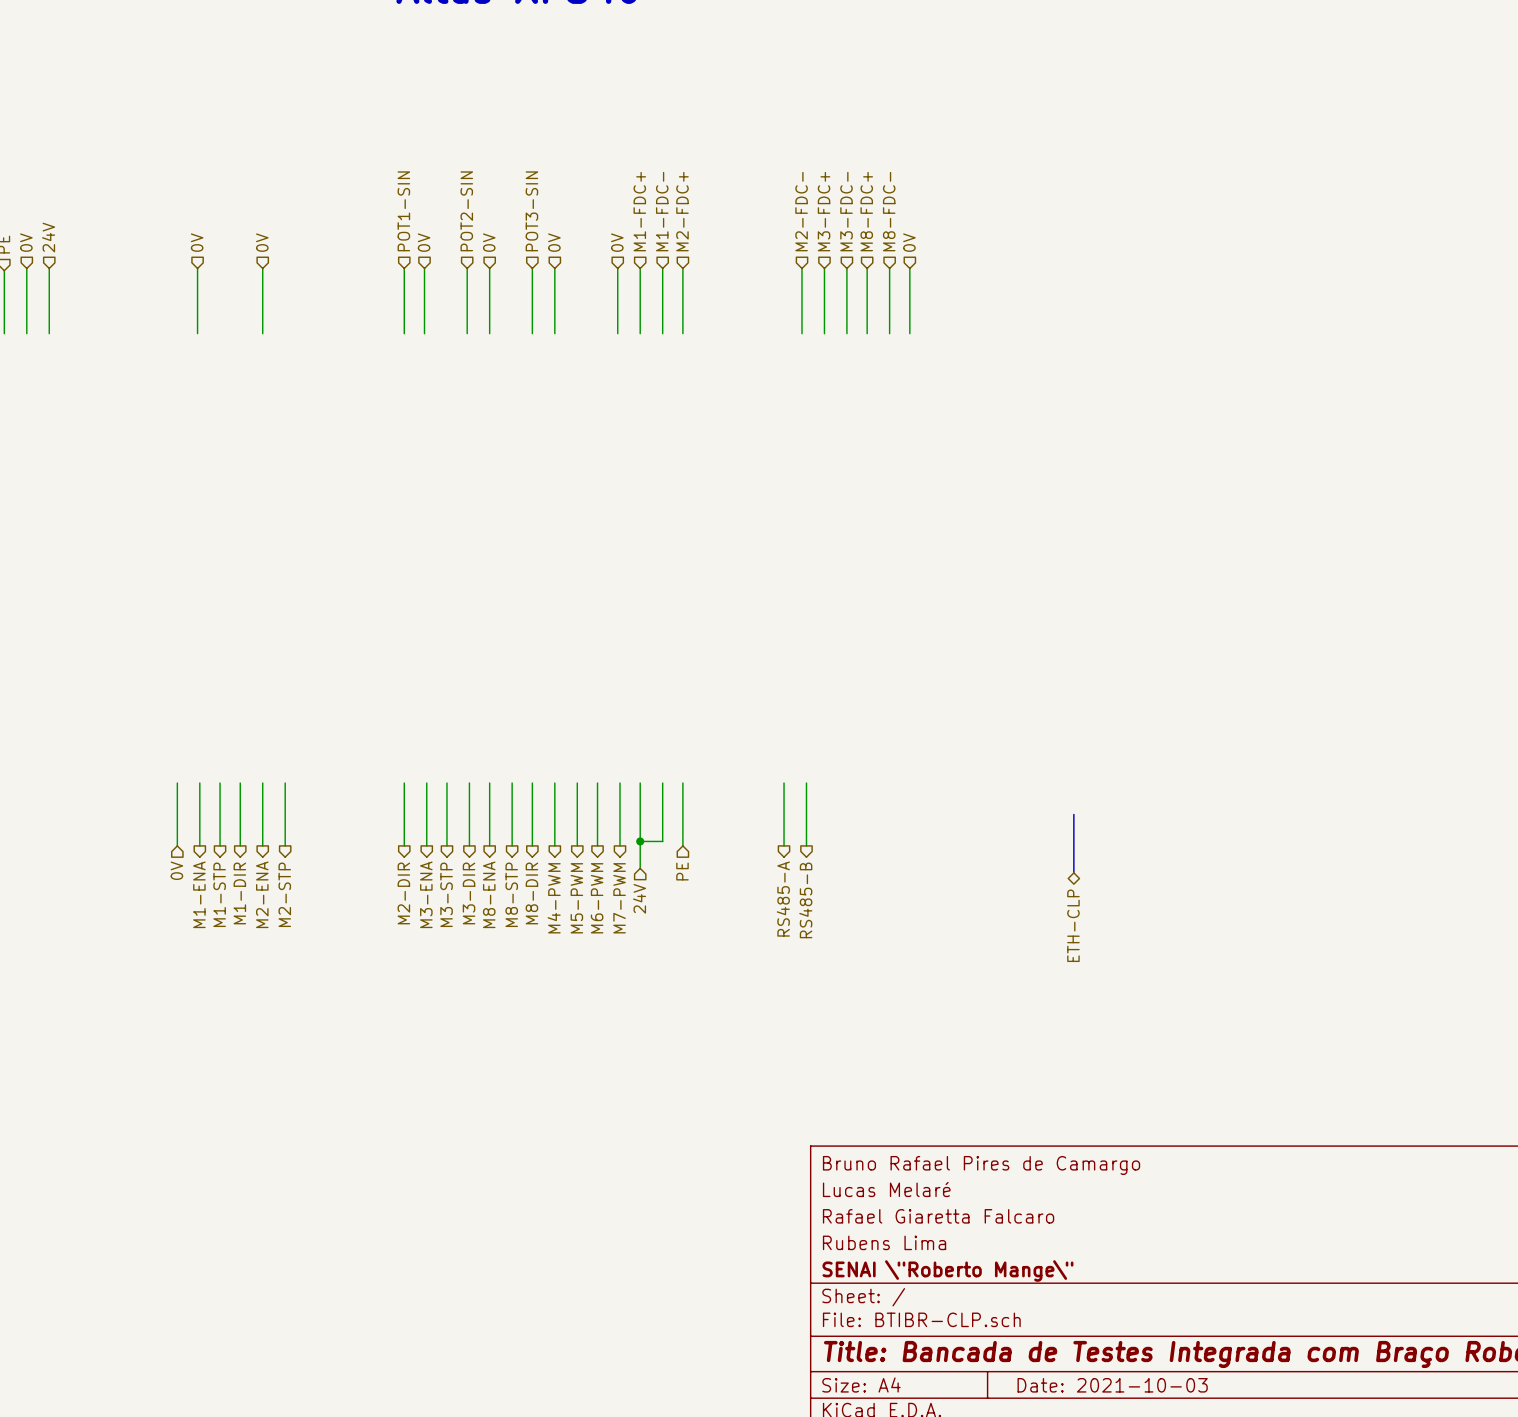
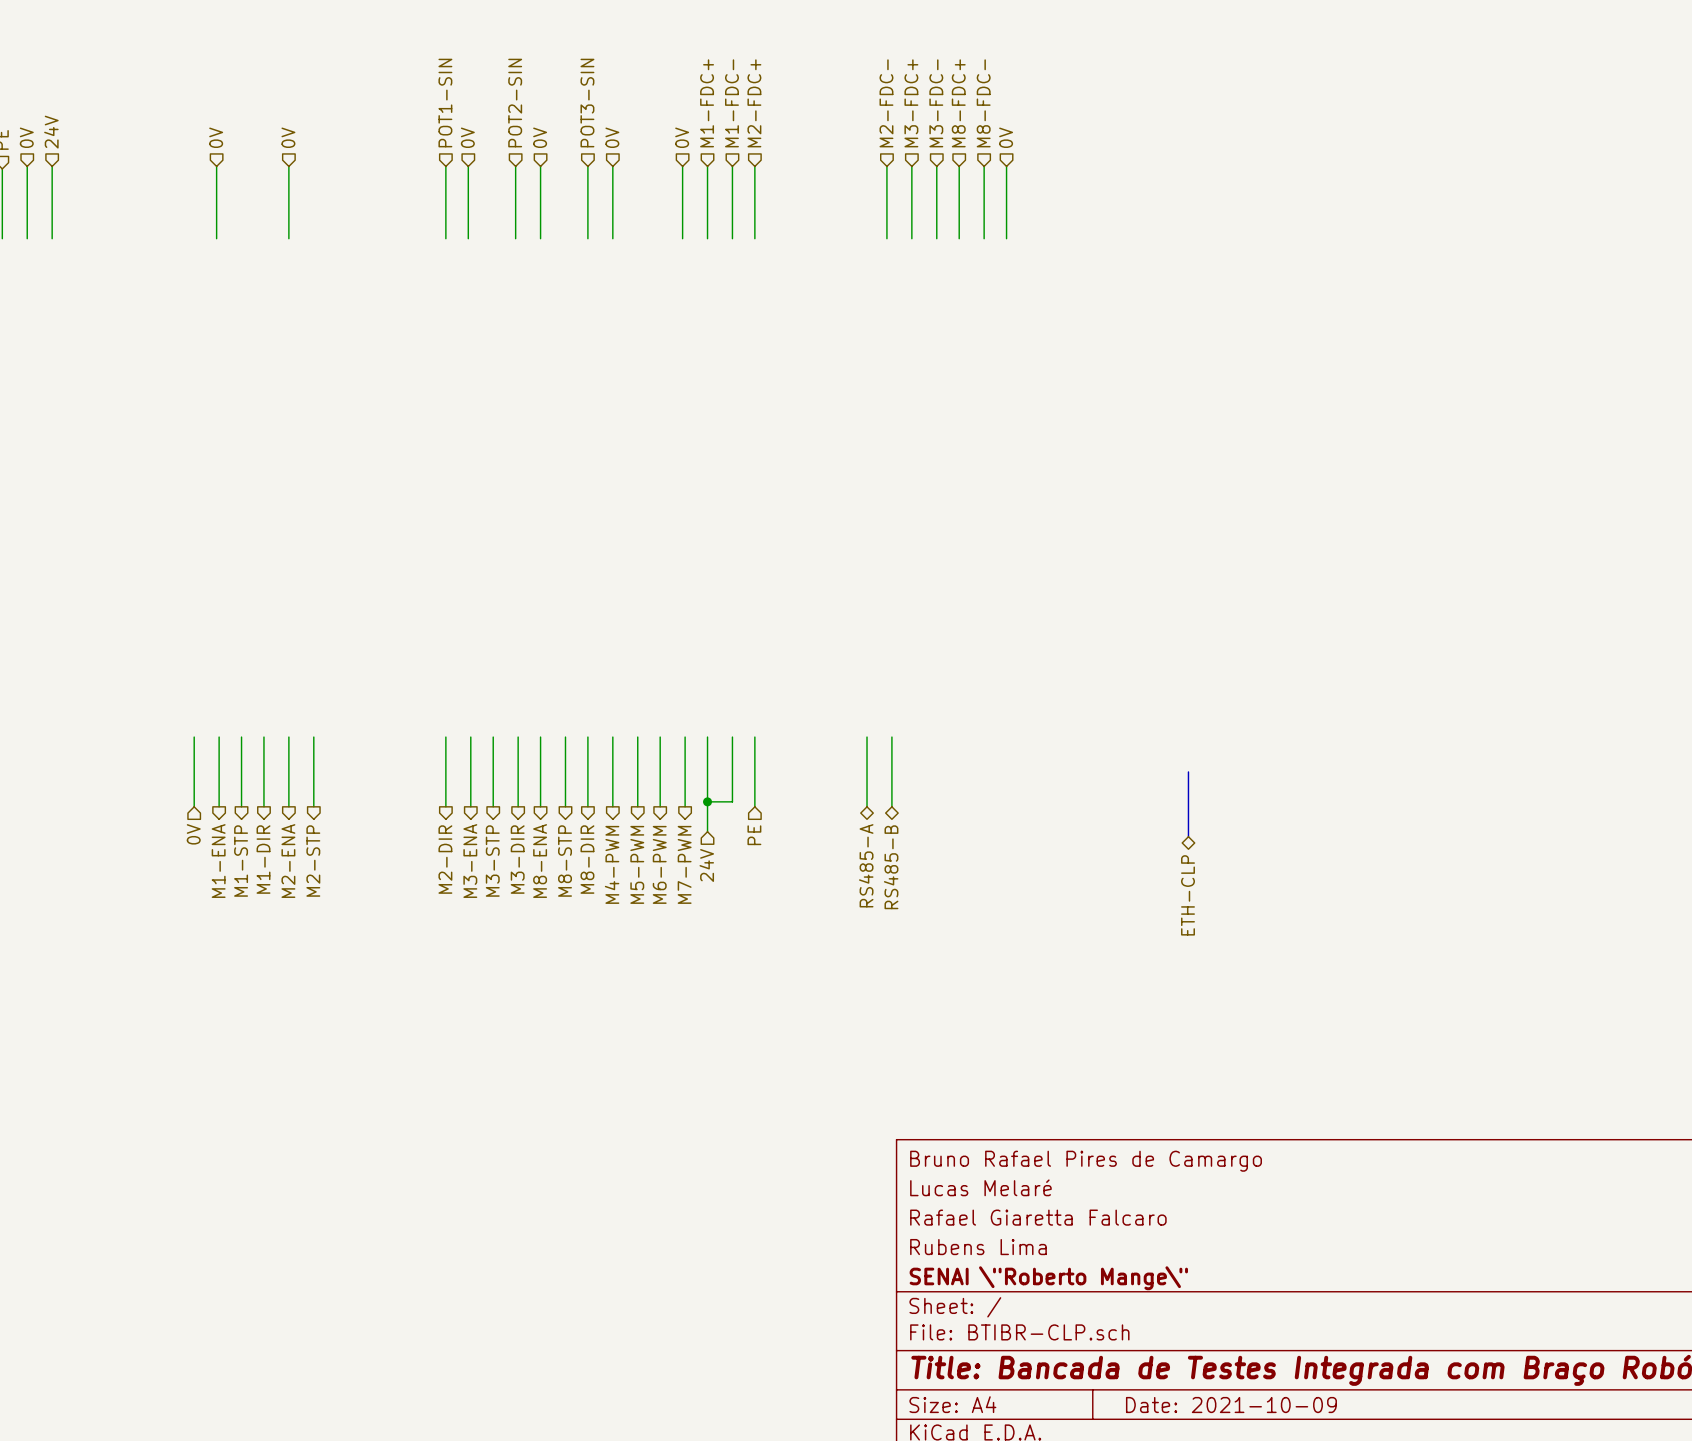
hierarchical label shape: output (783, 899) -> bidirectional (866, 865)
hierarchical label shape: output (805, 900) -> bidirectional (891, 867)
title block: Date: 2021-10-03 (1112, 1385) -> Date: 2021-10-09 (1231, 1405)

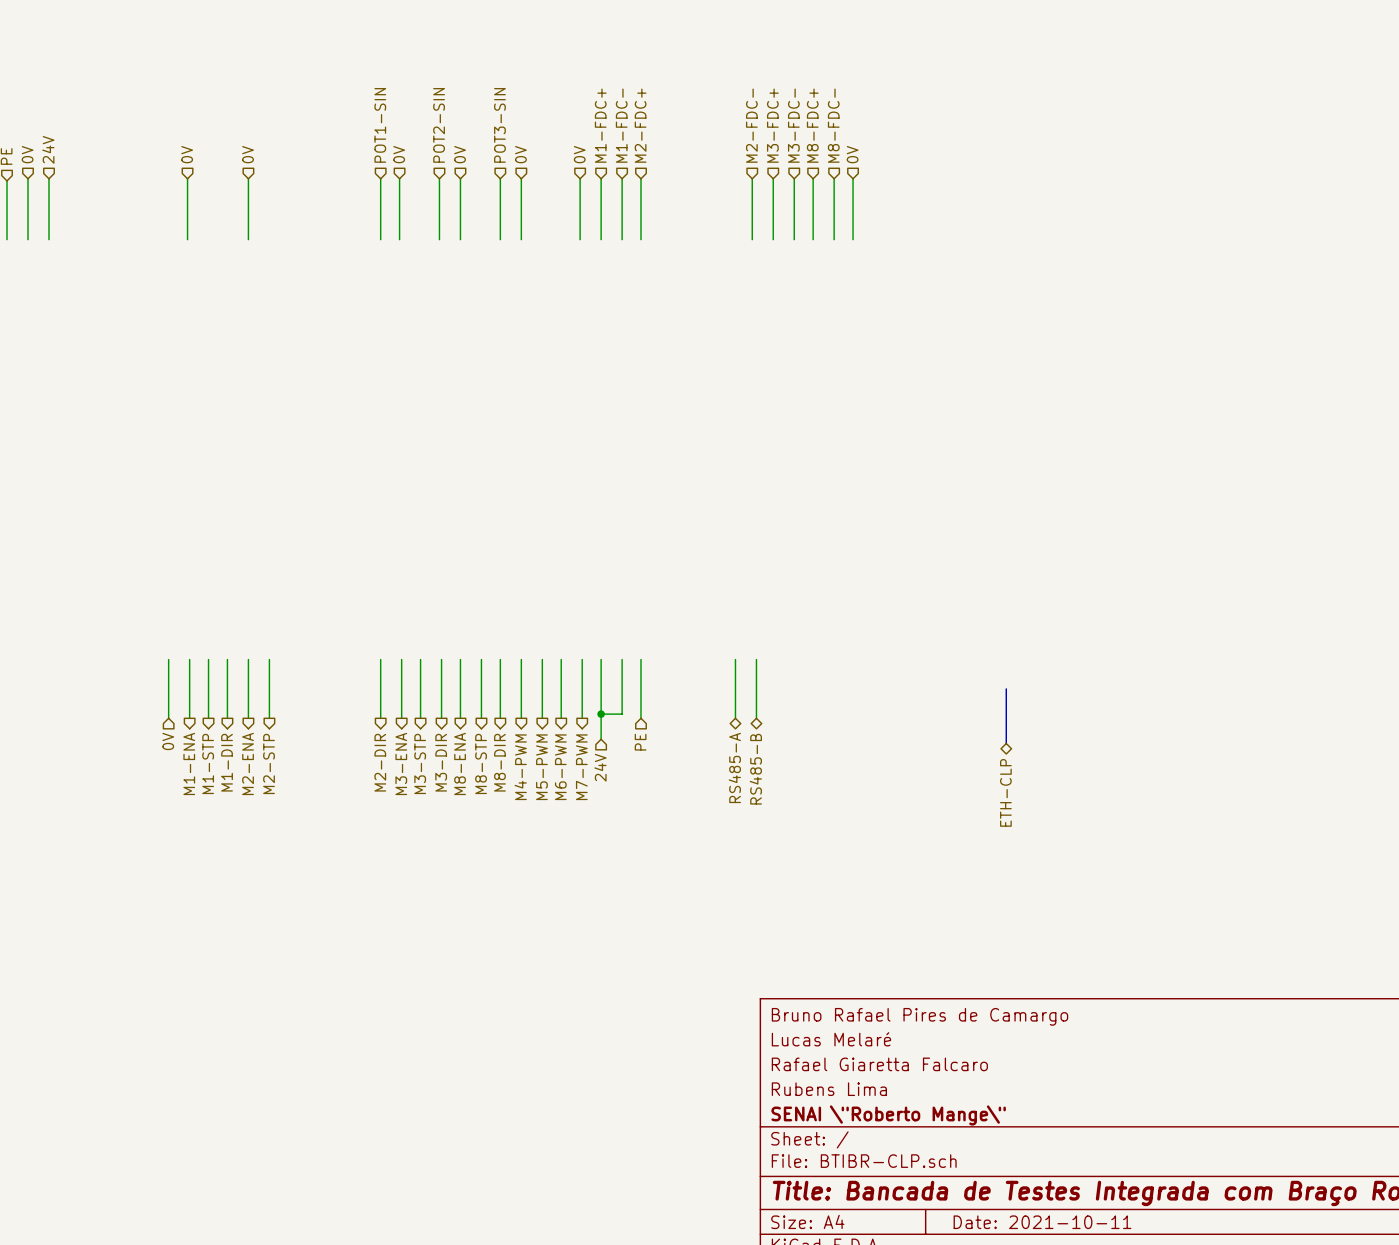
title block: Date: 2021-10-09 (1231, 1405) -> Date: 2021-10-11 (1042, 1222)

